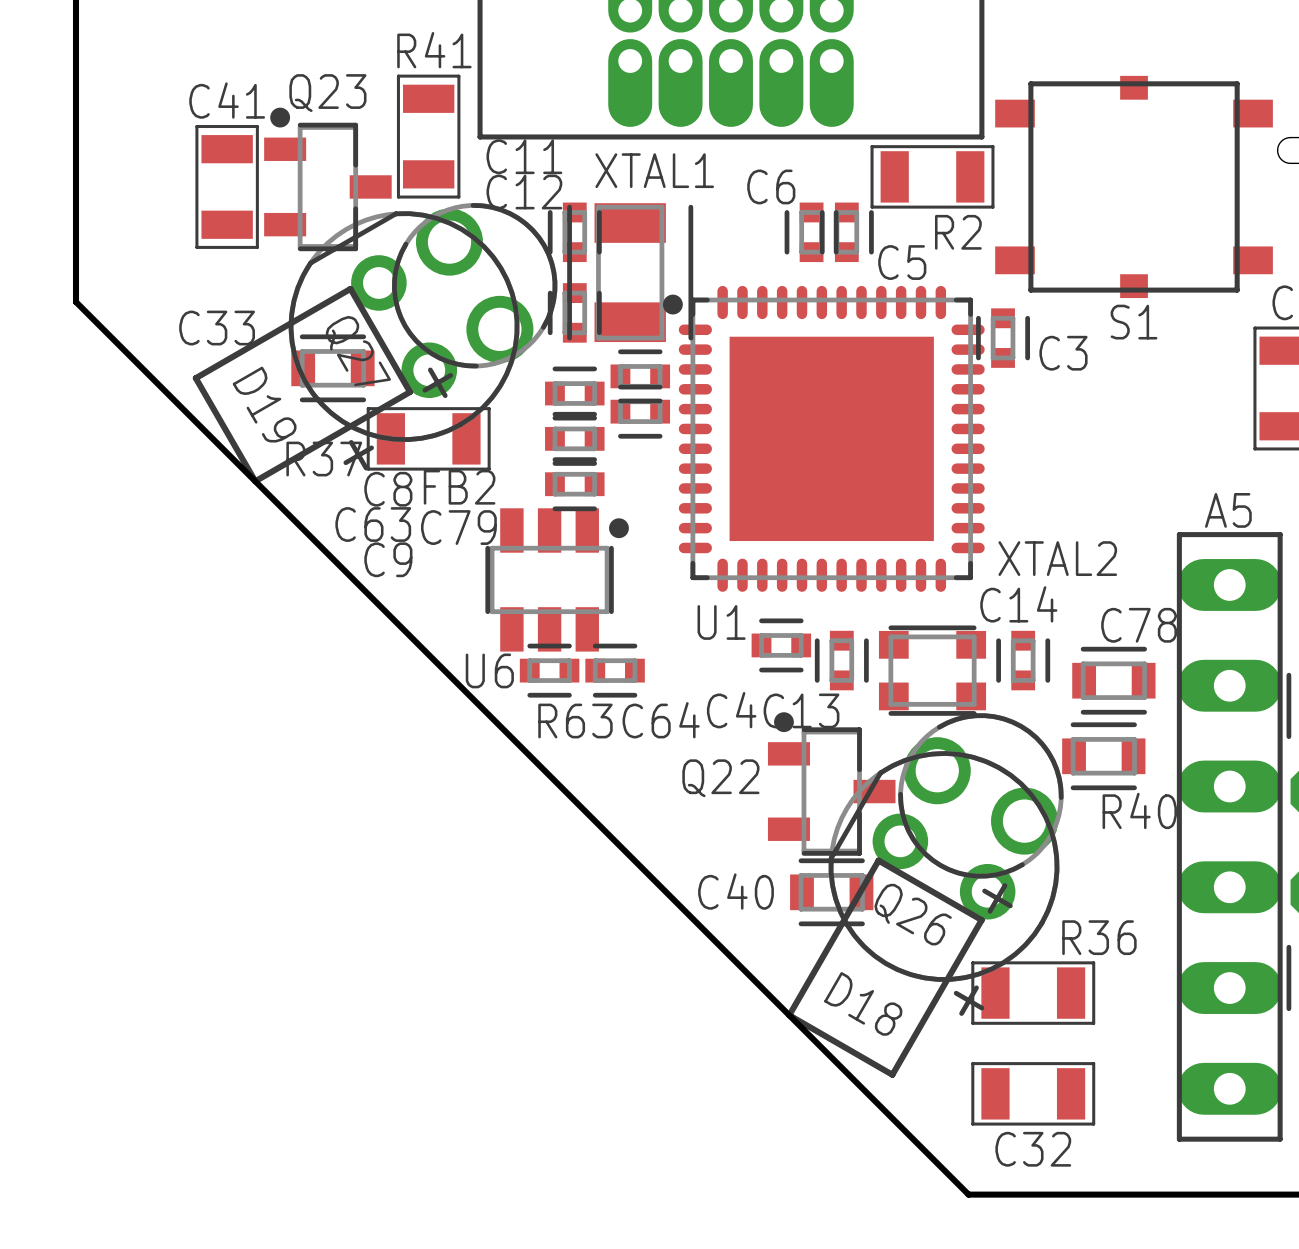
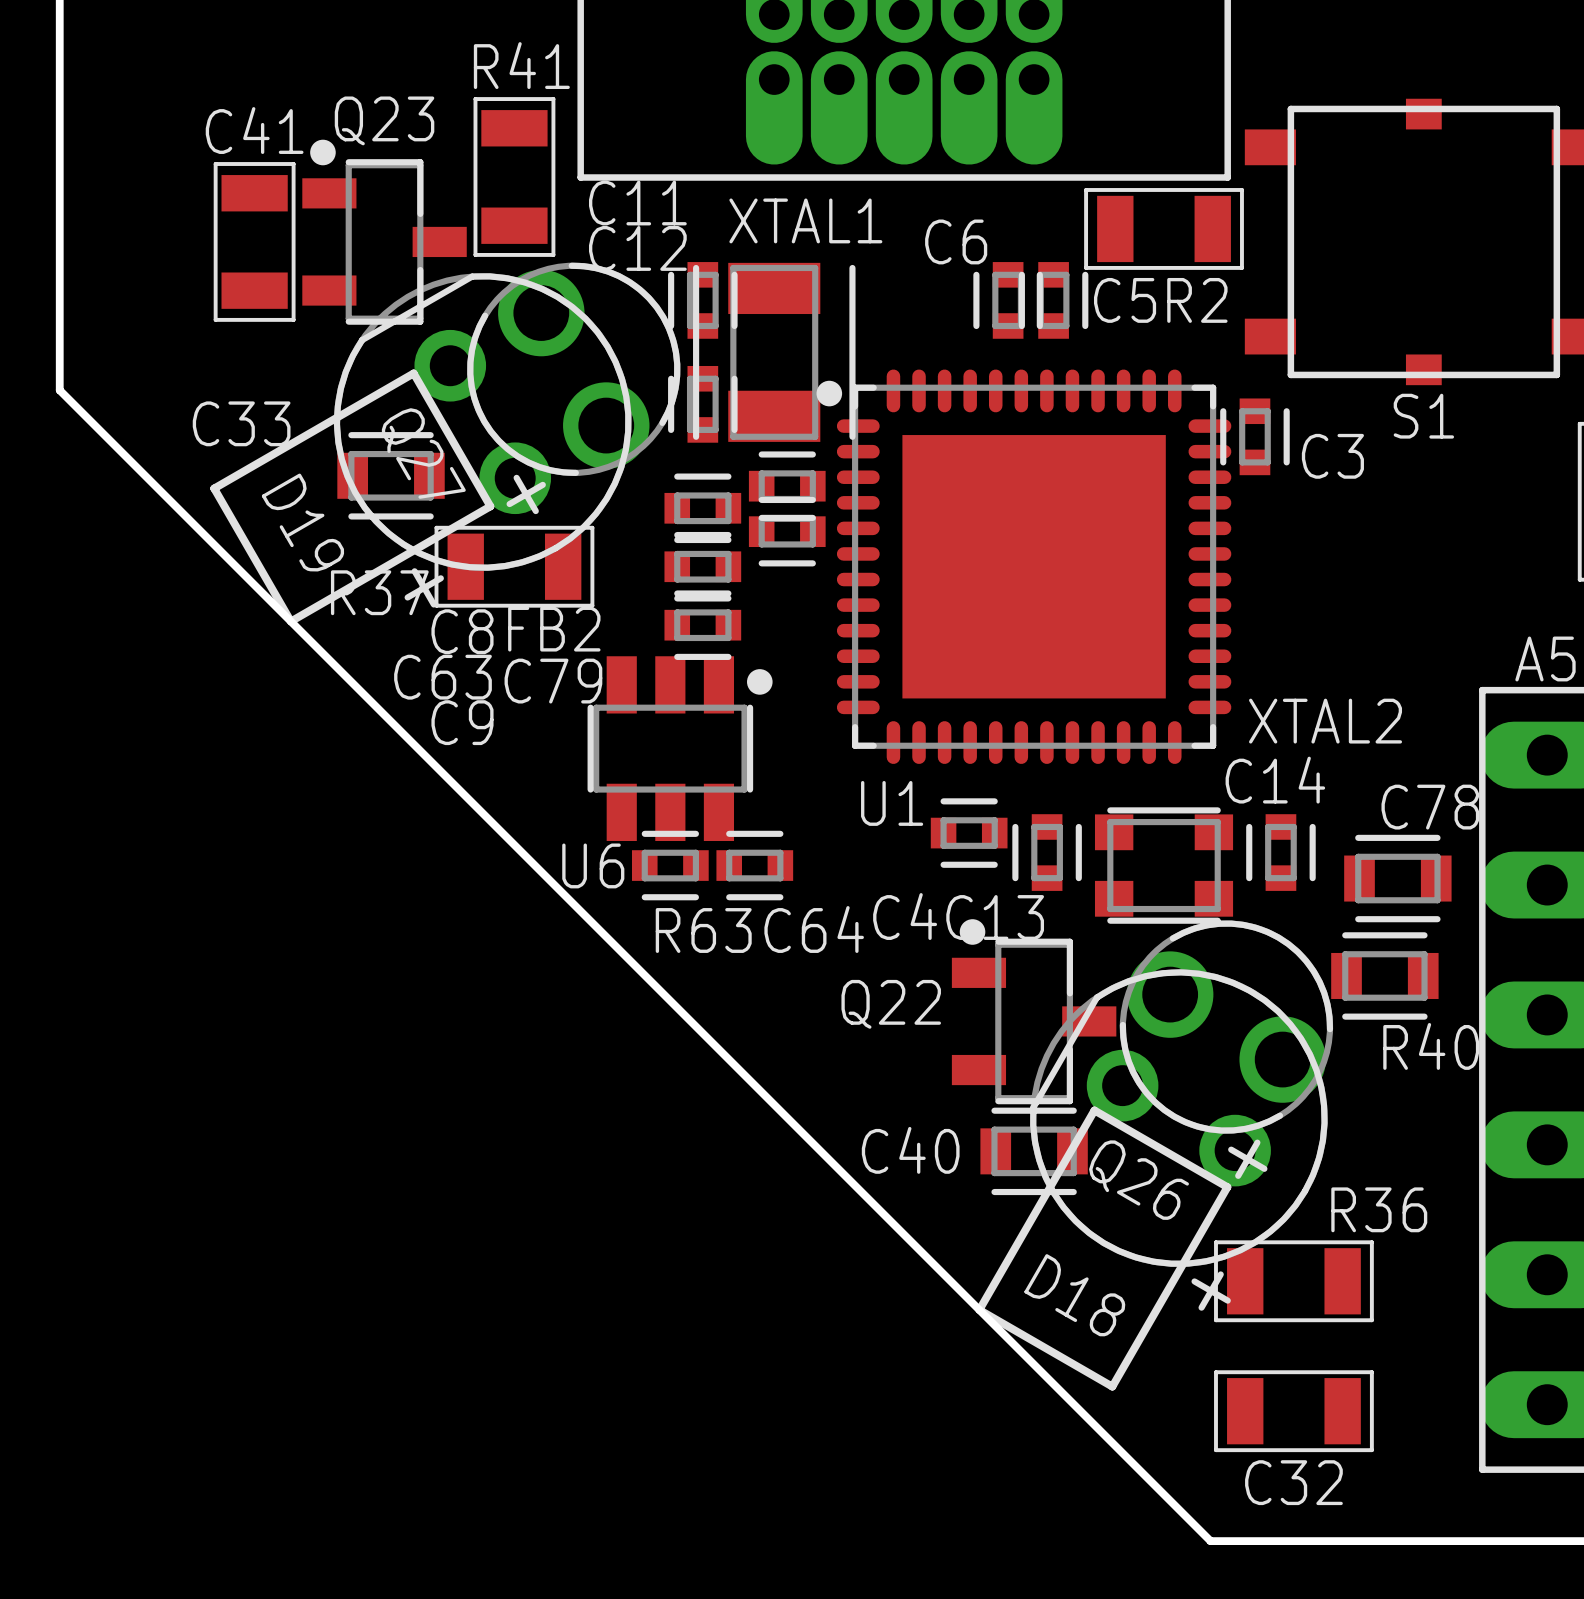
C5 name position: C5 (902, 262) -> C5 (1125, 300)

